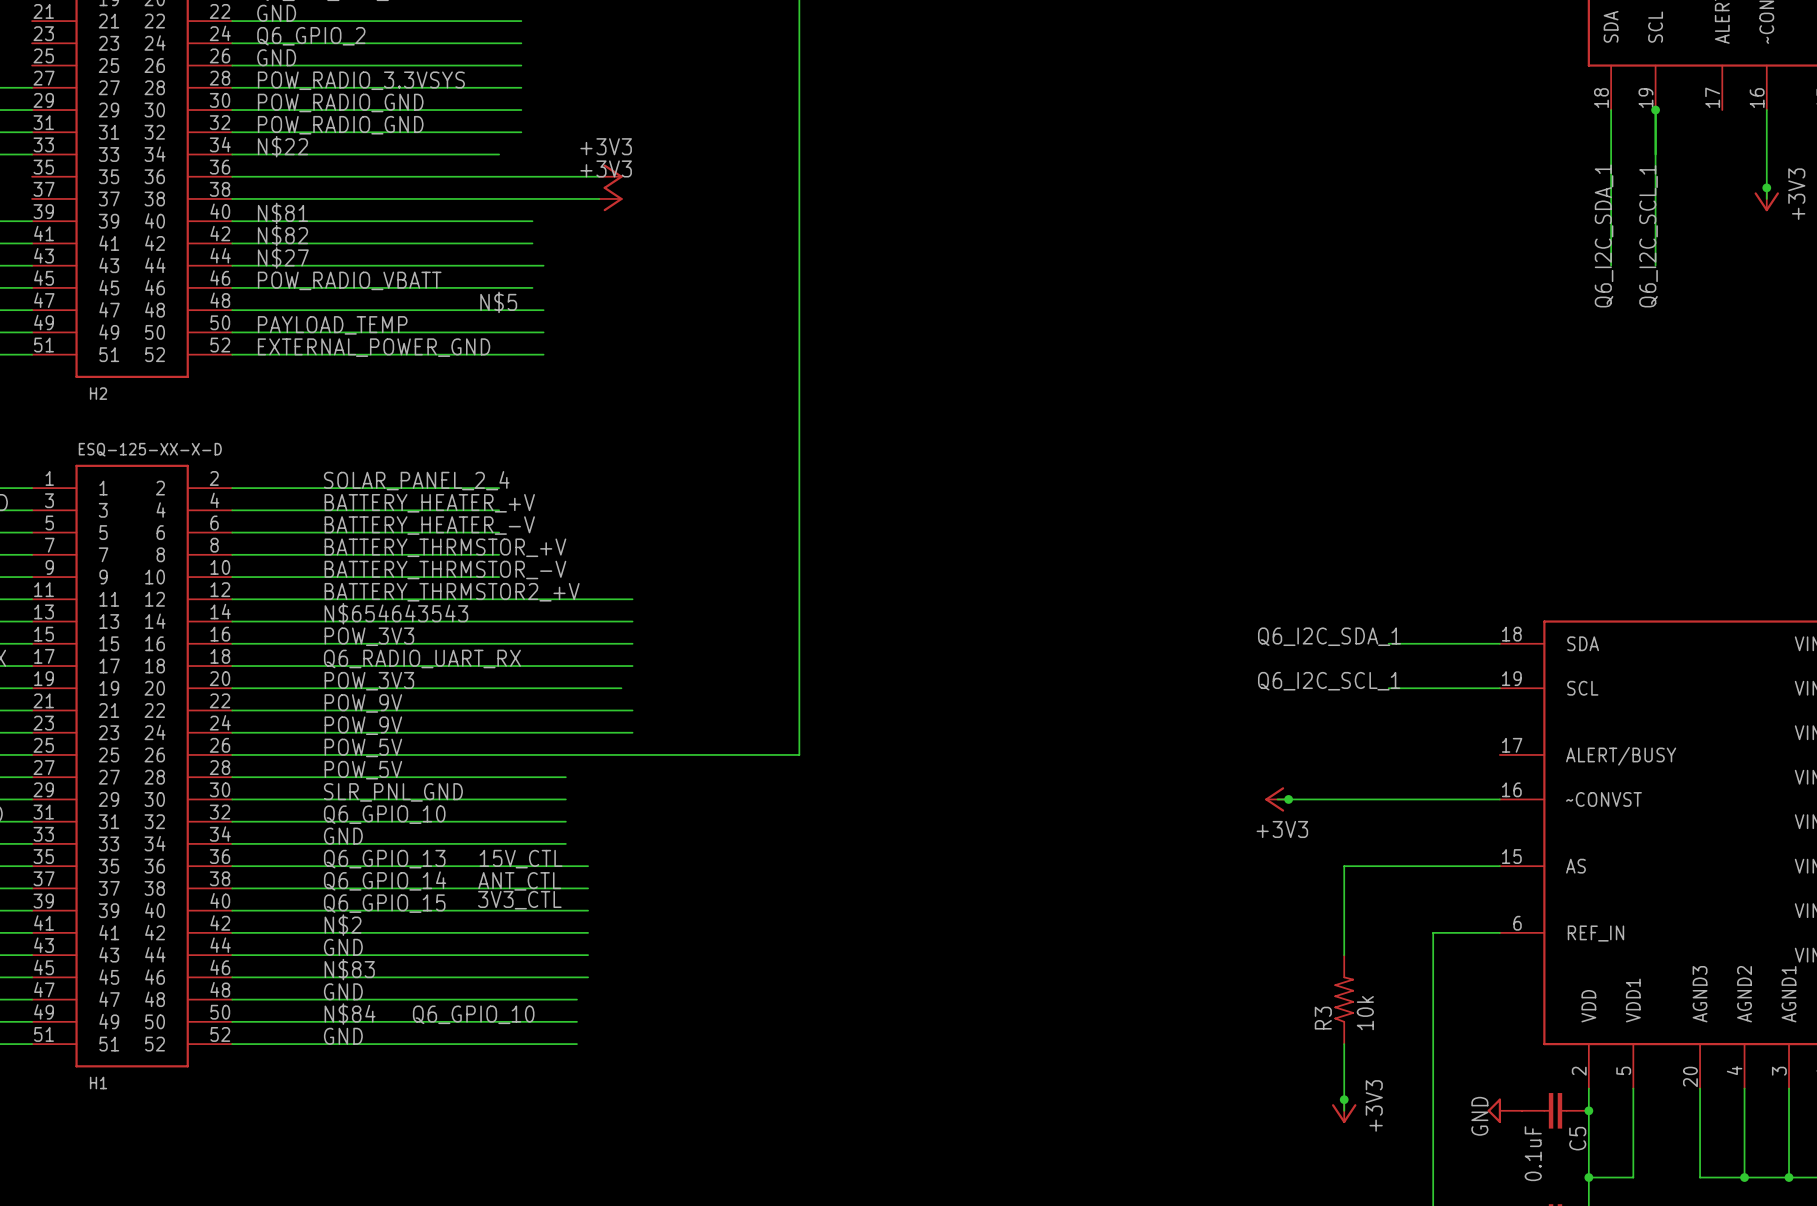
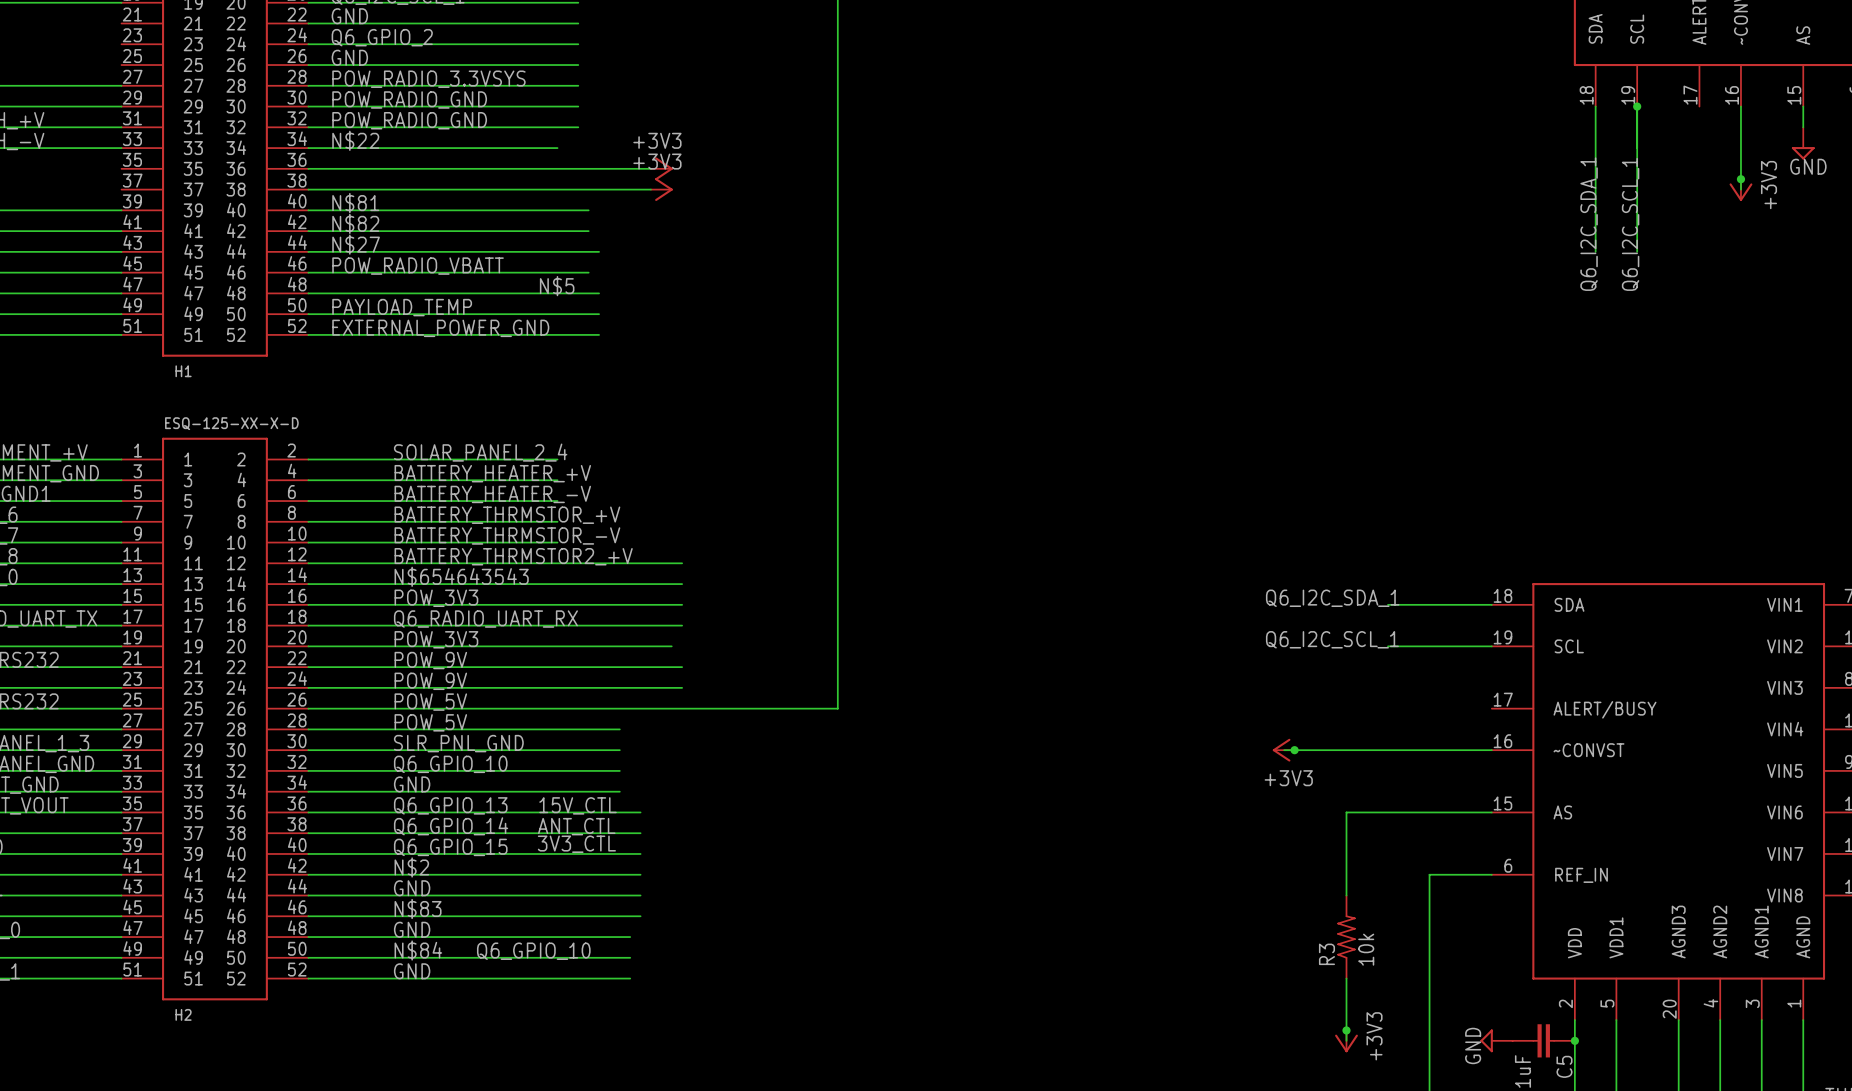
H2 name: H2 (98, 393) -> H1 (183, 371)
H1 name: H1 (98, 1083) -> H2 (183, 1014)

